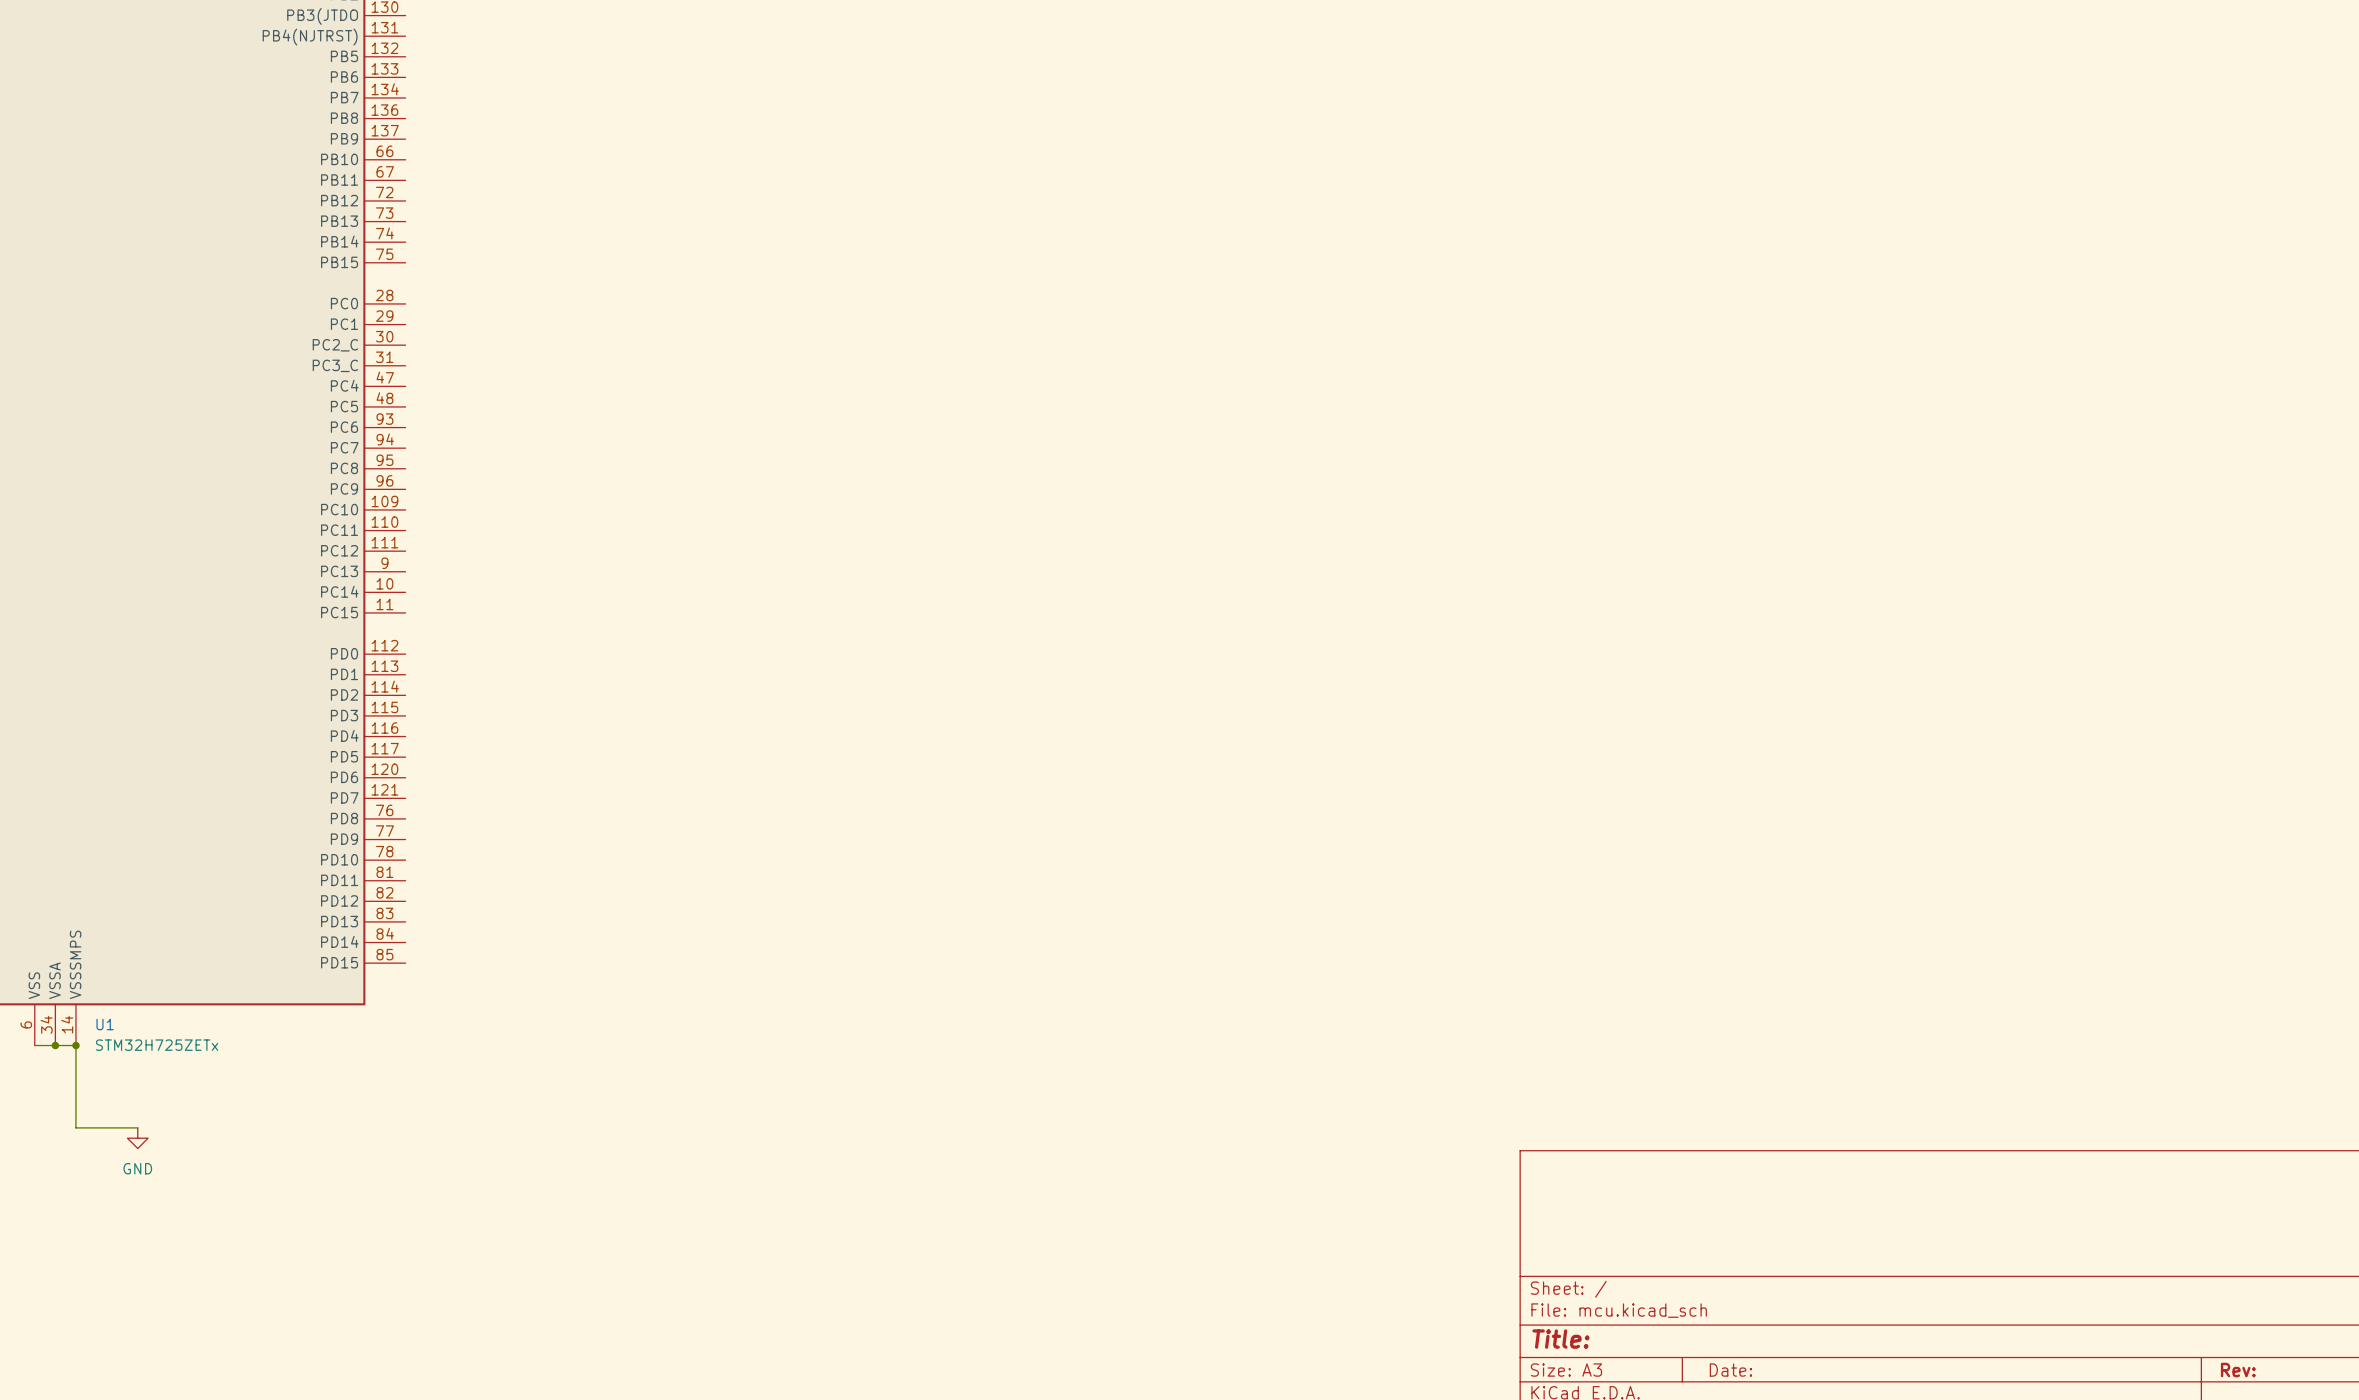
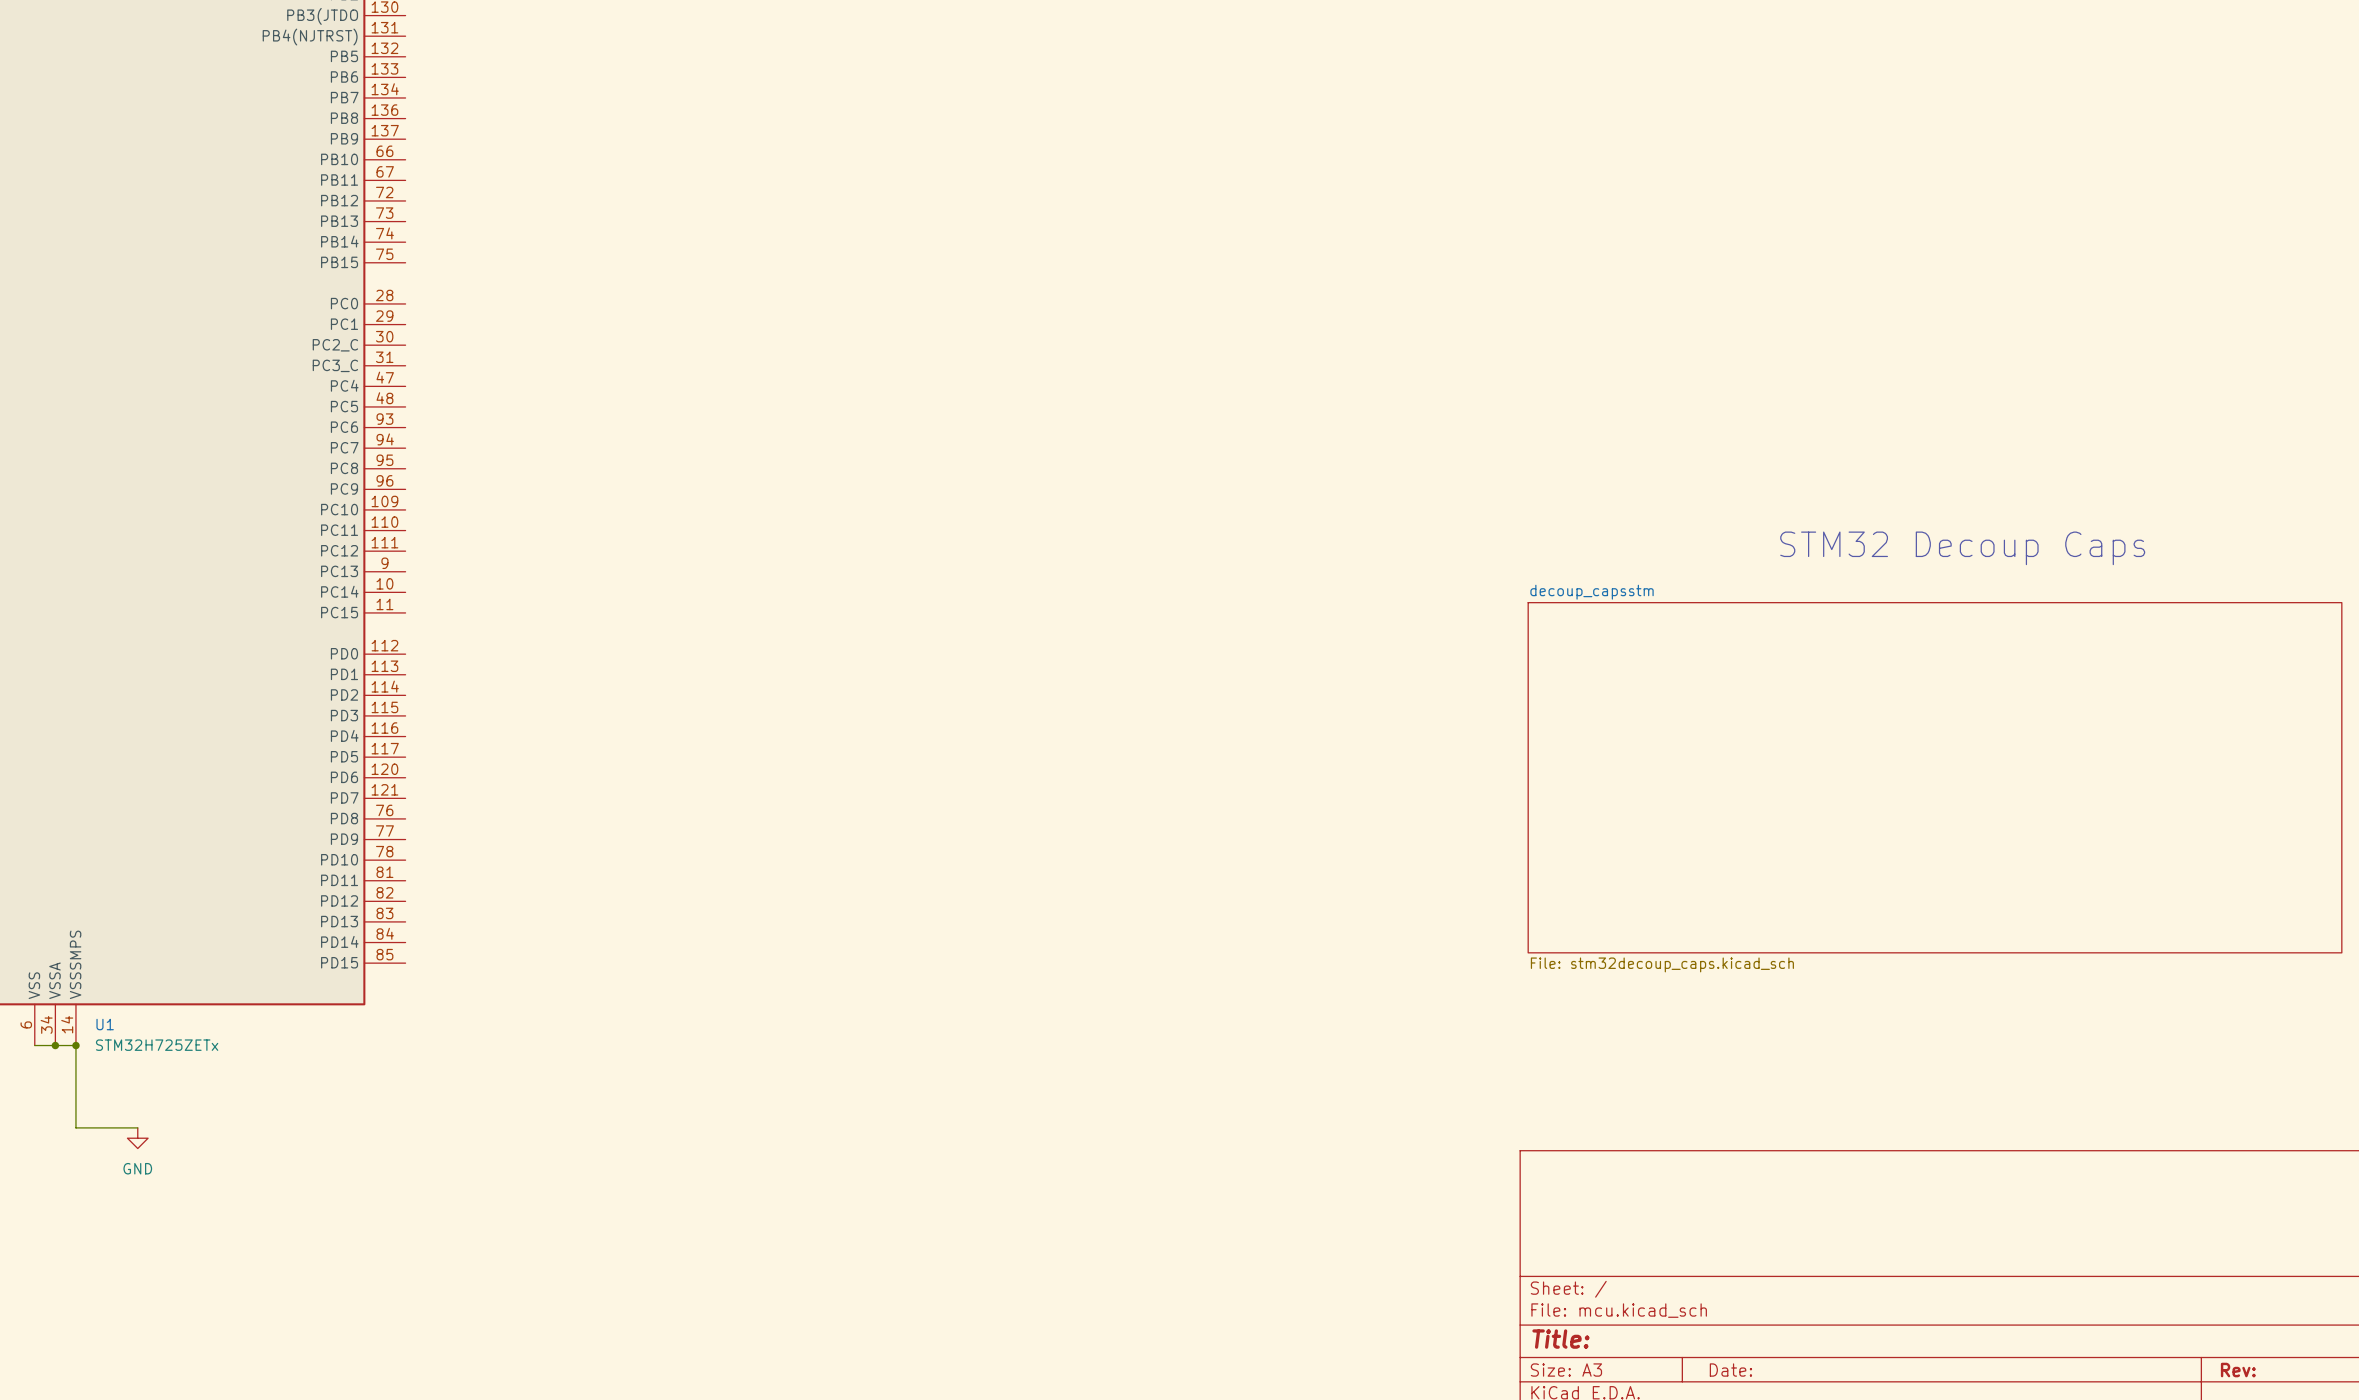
text: none -> STM32 Decoup Caps (1962, 548)
sheet decoup_capsstm: none -> File: stm32decoup_caps.kicad_sch (1935, 777)

